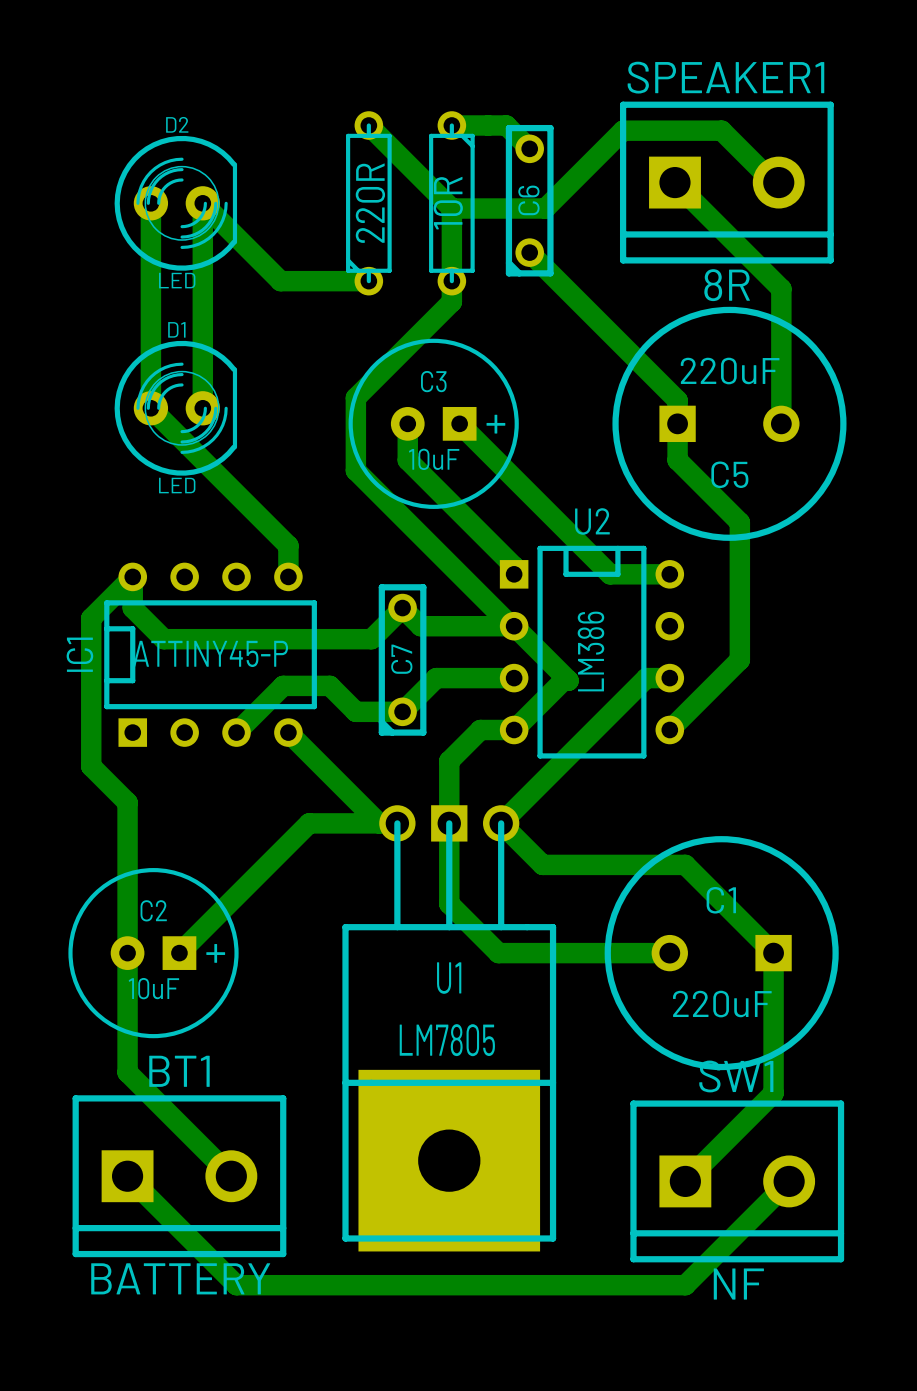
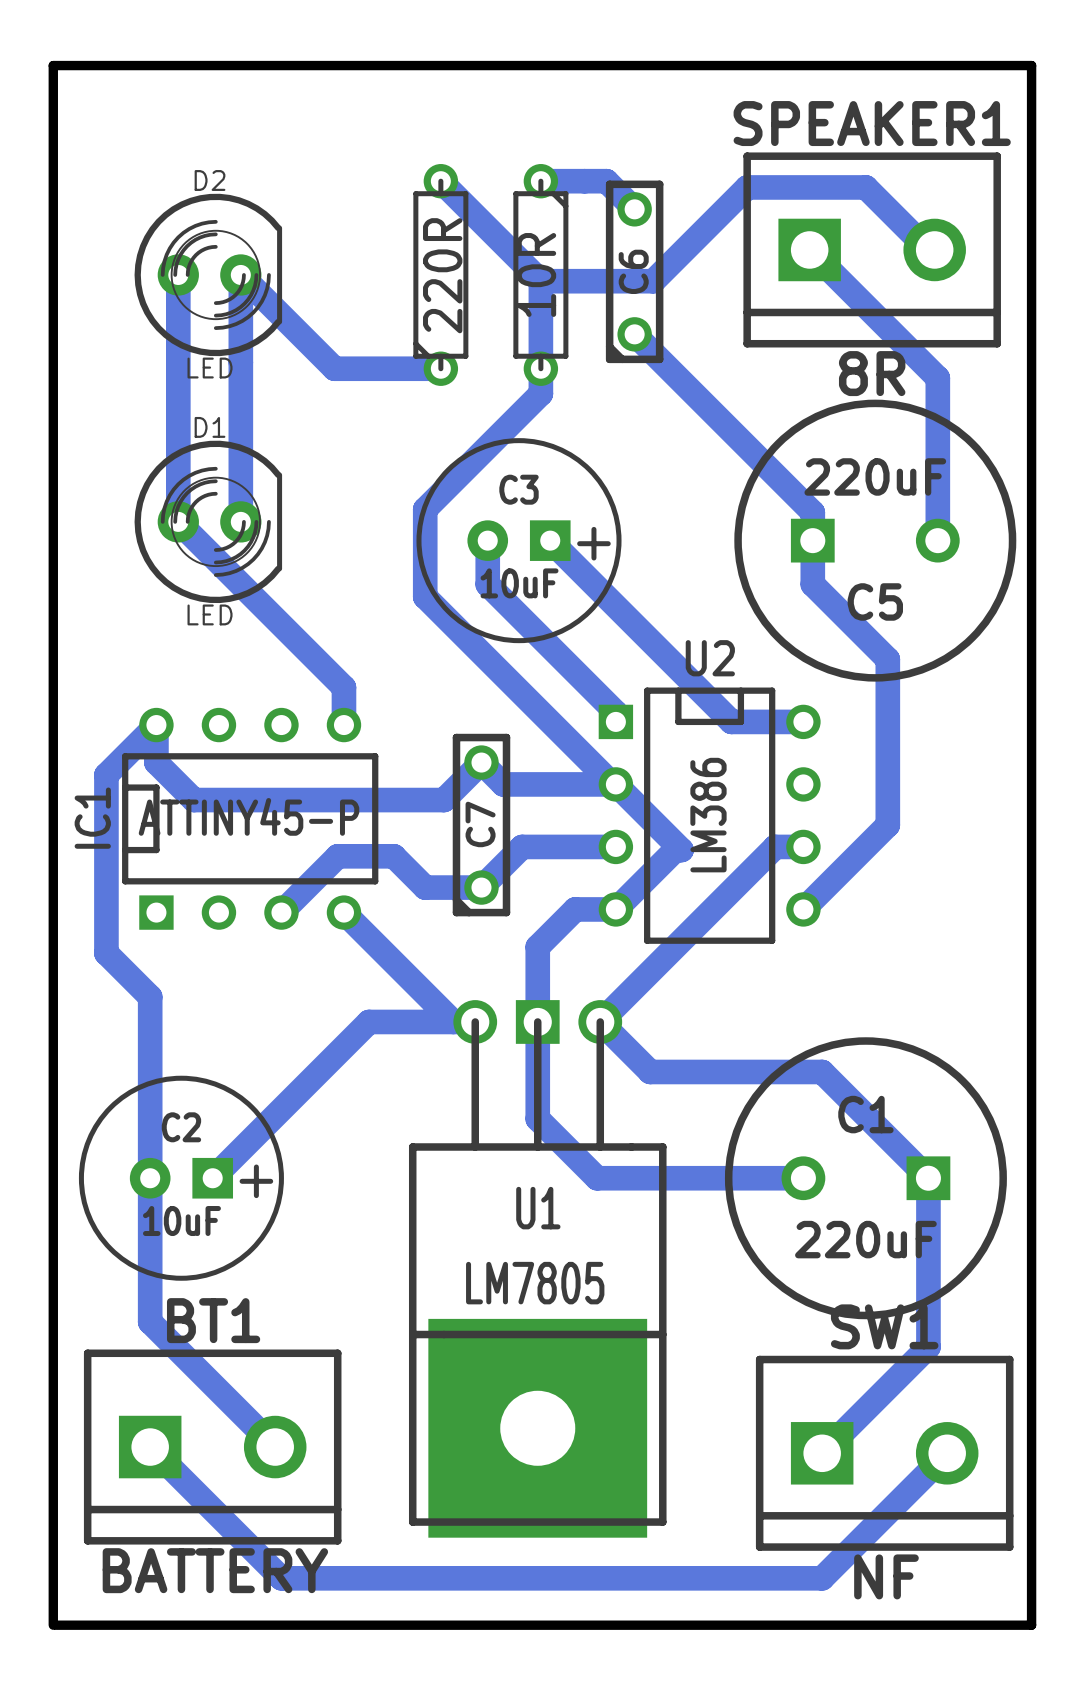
board edge: none -> (53, 1625) (53, 65) (1031, 65) (1031, 1625) (56, 1625)

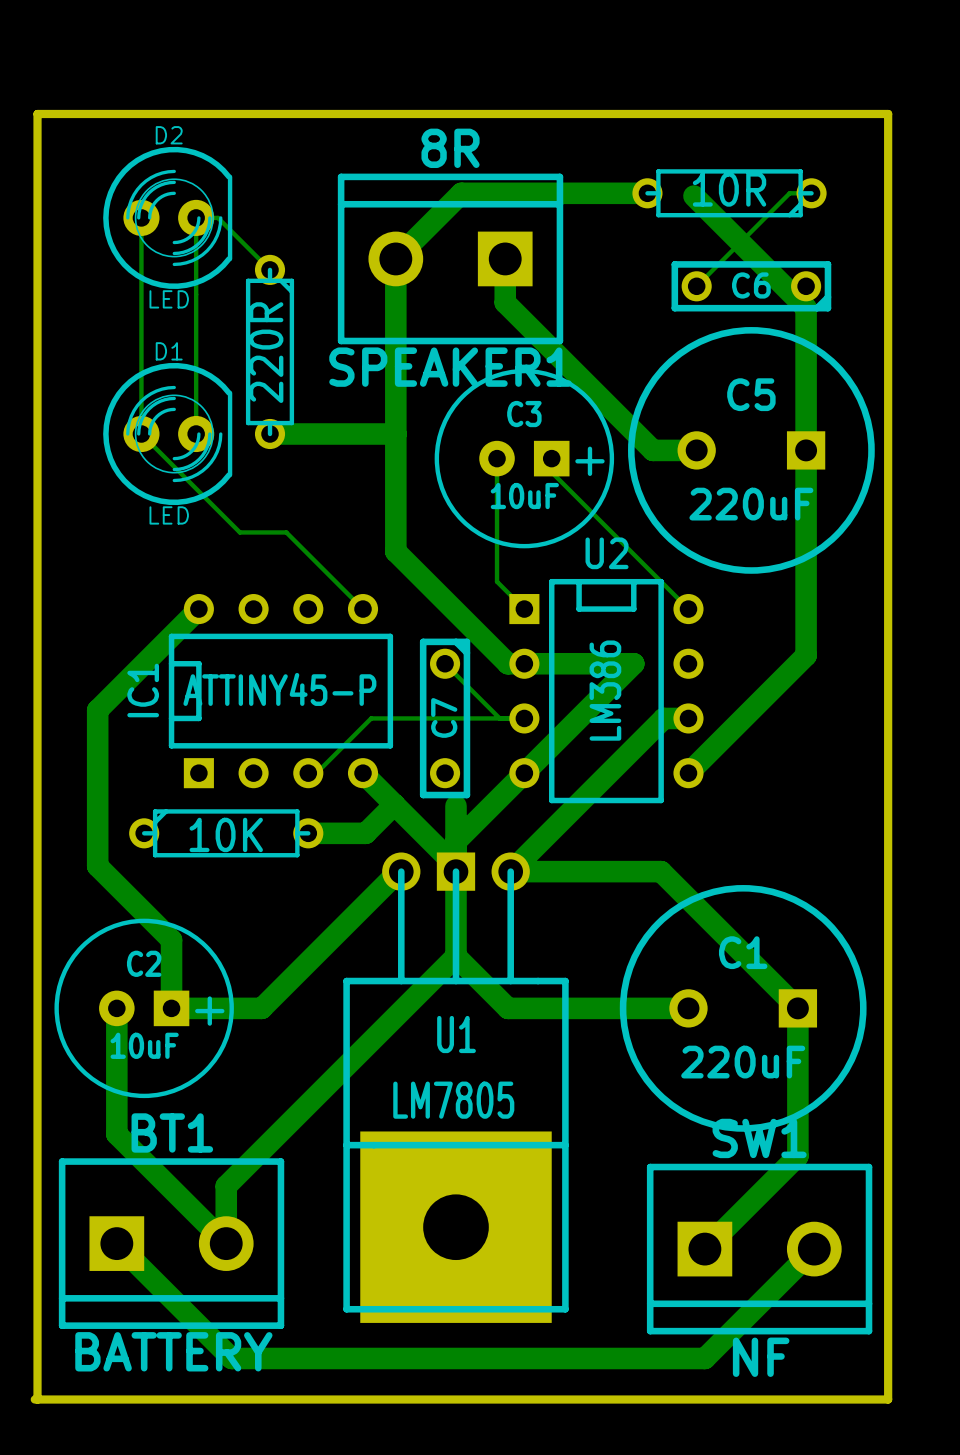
board edge: (1031, 156) (1031, 65) (53, 65) (53, 1625) -> (888, 113) (37, 113) (37, 1399)
bottom track: (440, 181) (540, 281) -> none
bottom track: (540, 181) (606, 181) (634, 209) -> none
bottom track: none -> (811, 193) (789, 193) (696, 286)
SPEAKER1 rotation: 0° (872, 249) -> 180° (450, 258)
SPEAKER1 position: (872, 249) -> (450, 258)
bottom track: (934, 249) (928, 249) (865, 187) (747, 187) (653, 281) (540, 281) -> none
C6 rotation: 0° (634, 271) -> 90° counterclockwise (751, 286)
C6 position: (634, 271) -> (751, 286)
bottom track width: thick (178, 274) (178, 521) (290, 634) -> thin (141, 217) (141, 434) (239, 532)
bottom track: (240, 274) (334, 368) (440, 368) -> (196, 217) (218, 217) (270, 269)
bottom track width: thick (240, 274) (240, 521) -> thin (196, 217) (196, 434)
part rotation: 0° (440, 274) -> 180° (270, 351)
part position: (440, 274) -> (270, 351)
part rotation: 0° (540, 274) -> 90° clockwise (729, 193)
part position: (540, 274) -> (729, 193)
bottom track: (540, 281) (540, 393) (425, 509) (425, 596) (612, 784) -> none
bottom track: none -> (505, 258) (505, 302) (652, 450) (696, 450)
bottom track: (634, 334) (812, 512) (812, 584) (887, 659) (887, 825) -> (806, 450) (806, 655) (762, 699)
bottom track: none -> (270, 434) (395, 434)
bottom track: (487, 540) (487, 584) (615, 712) (615, 721) -> (497, 458) (497, 581) (524, 609)
C3 position: (519, 540) -> (524, 458)
bottom track: (550, 540) (731, 721) (803, 721) -> (551, 458) (551, 472) (688, 609)
C5 rotation: 0° (875, 540) -> 180° (751, 450)
bottom track: (290, 634) (343, 687) (343, 725) -> (239, 532) (286, 532) (363, 609)
bottom track: none -> (445, 663) (499, 718)
bottom track: (597, 784) (503, 784) (481, 762) (443, 800) (193, 800) (156, 762) (156, 725) (106, 775) (106, 953) (150, 996) (150, 1178) -> (507, 663) (395, 551) (395, 258) (461, 193) (647, 193)
bottom track: (615, 784) (681, 850) (675, 850) -> (524, 663) (633, 663) (576, 721)
IC1 position: (250, 818) -> (280, 691)
C7 rotation: 0° (481, 825) -> 180° (445, 718)
bottom track: (522, 846) (481, 887) (425, 887) (393, 856) (337, 856) (281, 912) -> (442, 718) (371, 718) (316, 773) (308, 773)
bottom track width: thick (522, 846) (615, 846) -> thin (442, 718) (524, 718)
bottom track: none -> (363, 773) (455, 866)
bottom track: (615, 909) (575, 909) (537, 946) -> (524, 773) (455, 841)
bottom track: (343, 912) (453, 1021) (475, 1021) -> none
bottom track: none -> (394, 804) (365, 833) (308, 833)
part: none -> 10K (226, 833)
bottom track: (472, 1021) (368, 1021) (212, 1178) -> (398, 871) (261, 1008) (171, 1008) (171, 940) (97, 866) (97, 710) (198, 609)
bottom track: (600, 1021) (650, 1071) (822, 1071) -> (510, 871) (661, 871) (704, 915)
bottom track: none -> (455, 956) (226, 1186) (226, 1243)

